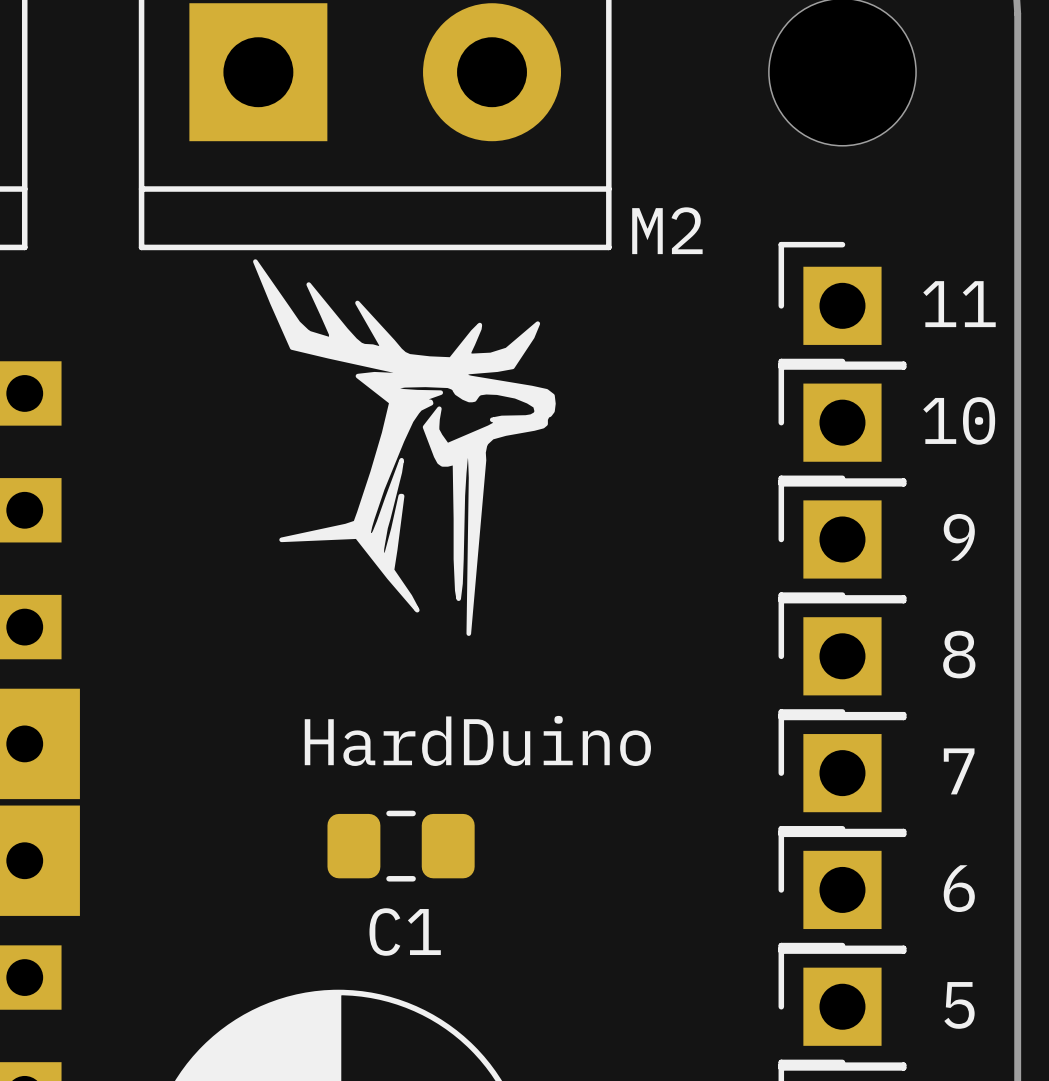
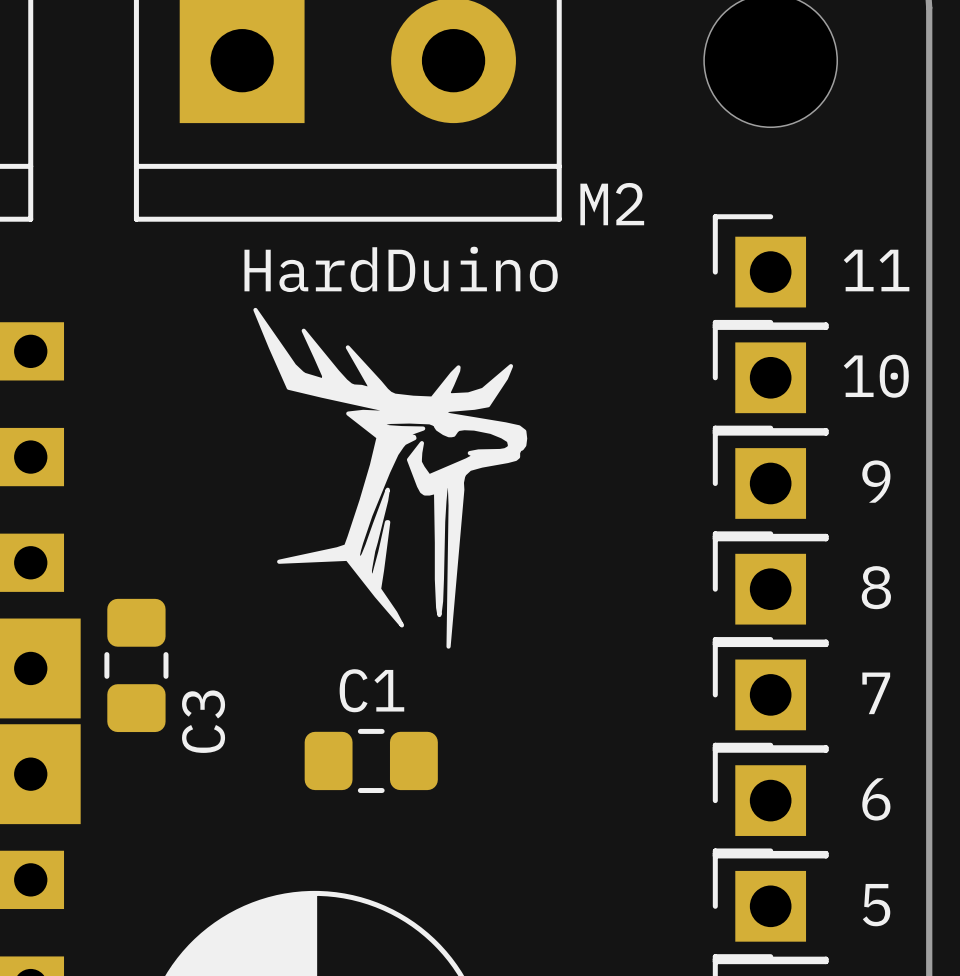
drawing position: (404, 447) -> (390, 478)
C3: none -> (136, 665)
text position: HardDuino (477, 740) -> HardDuino (401, 269)
C1 name position: C1 (405, 932) -> C1 (371, 690)

